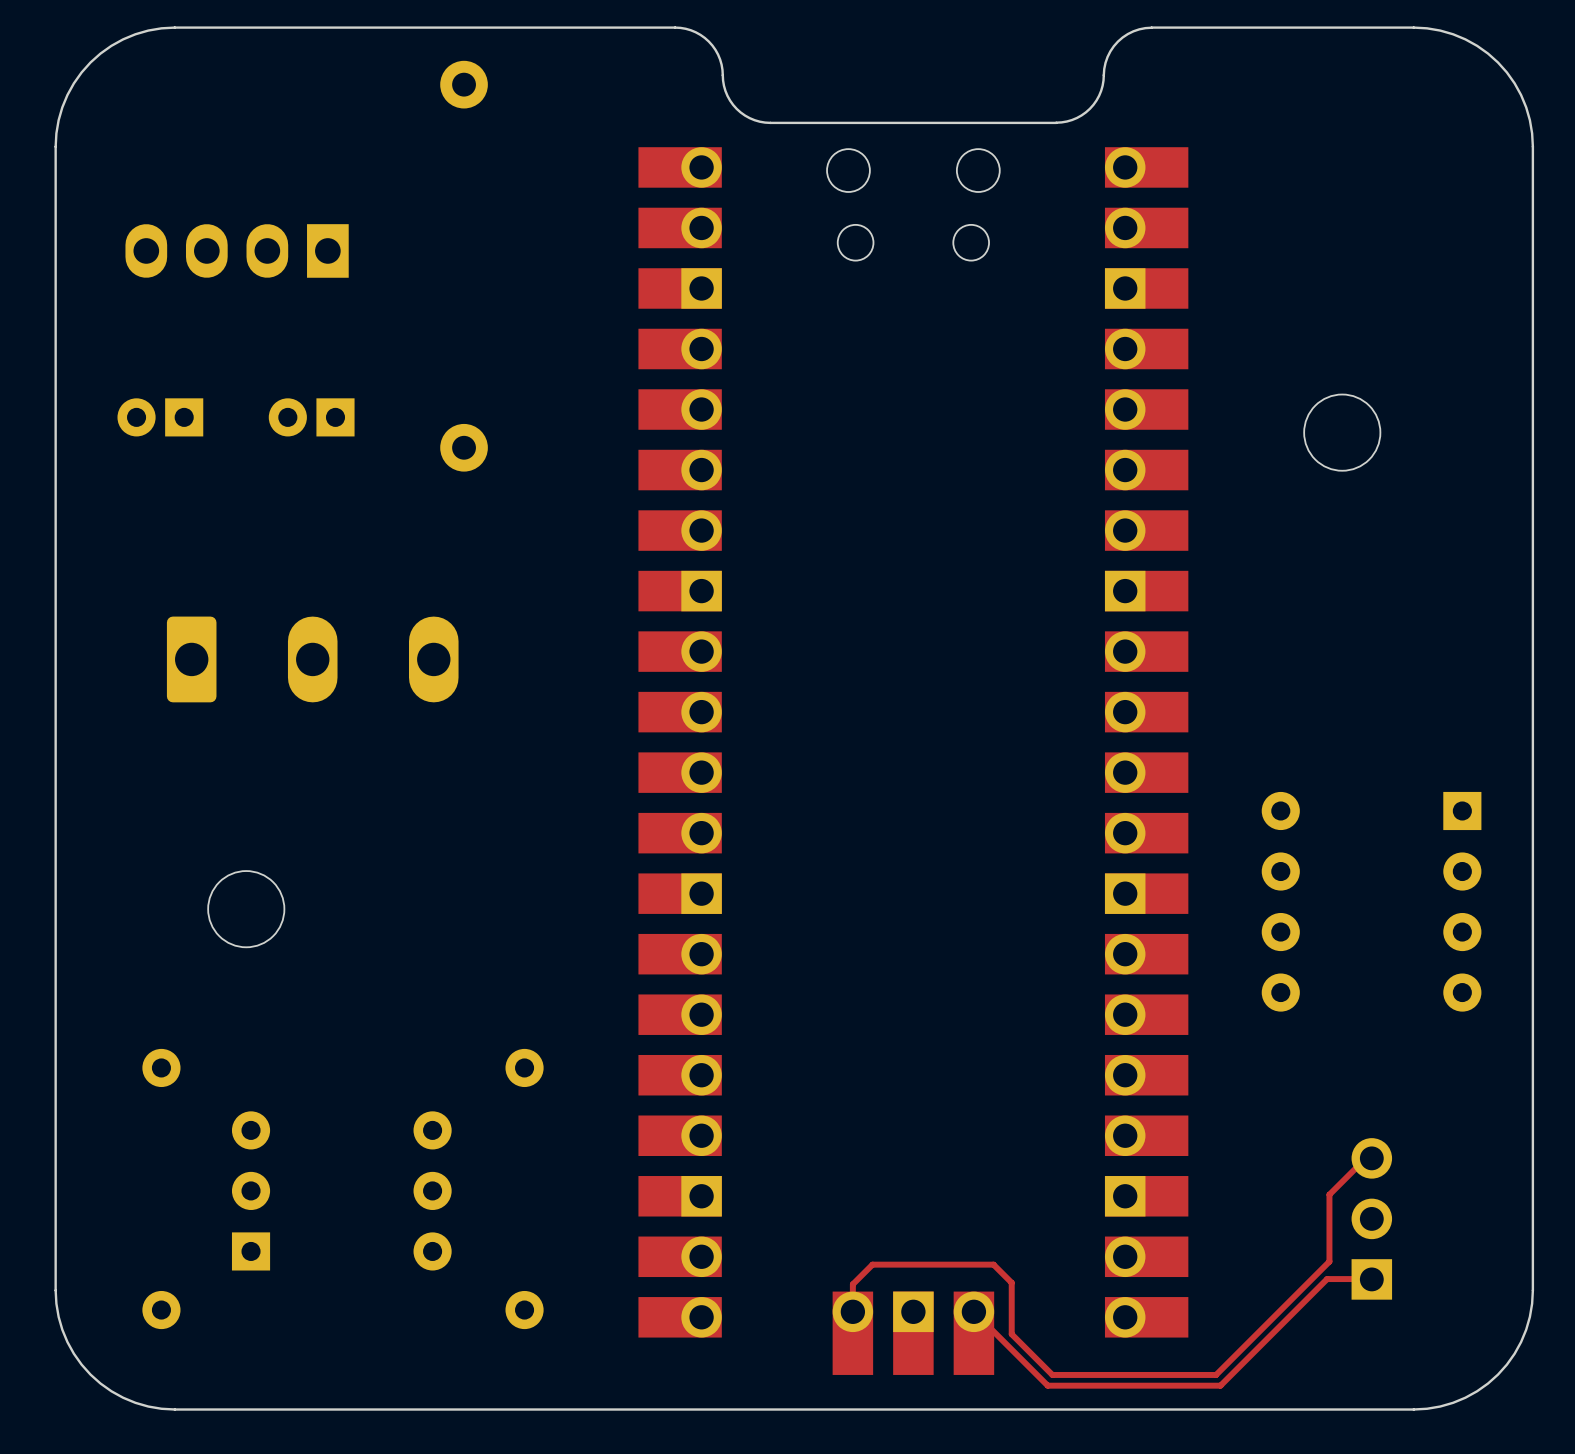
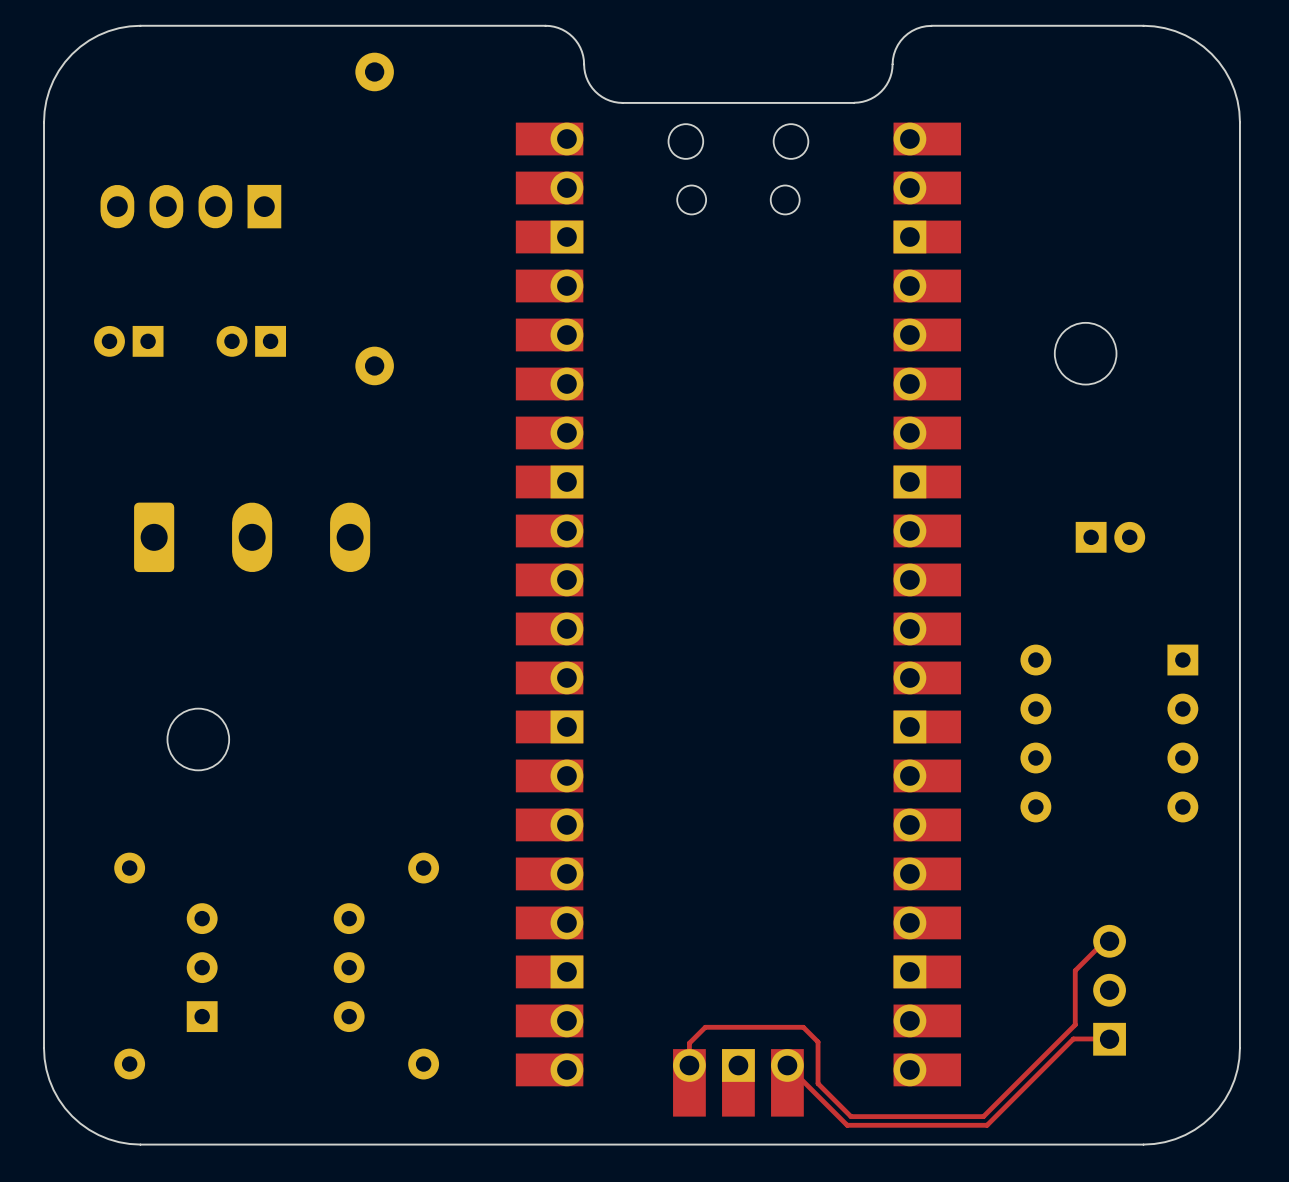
part: none -> (1110, 537)

